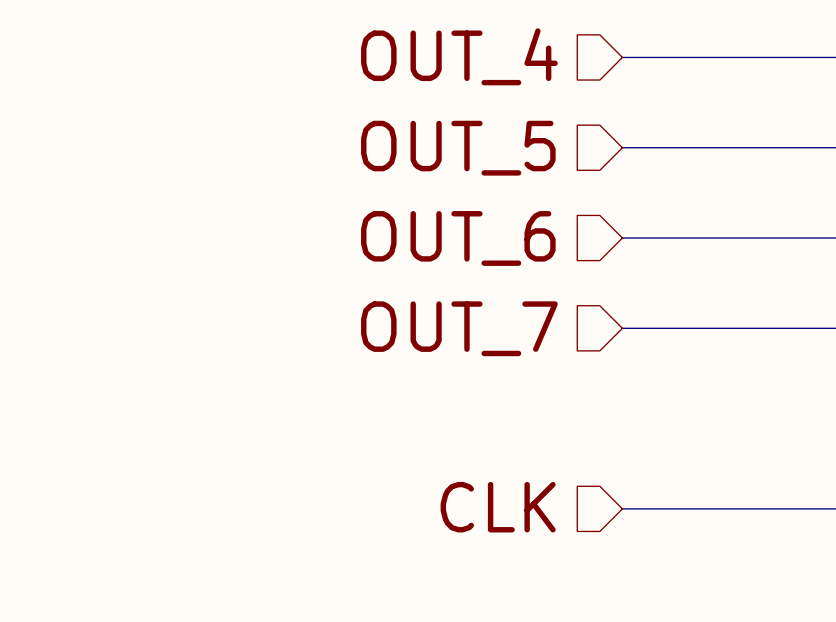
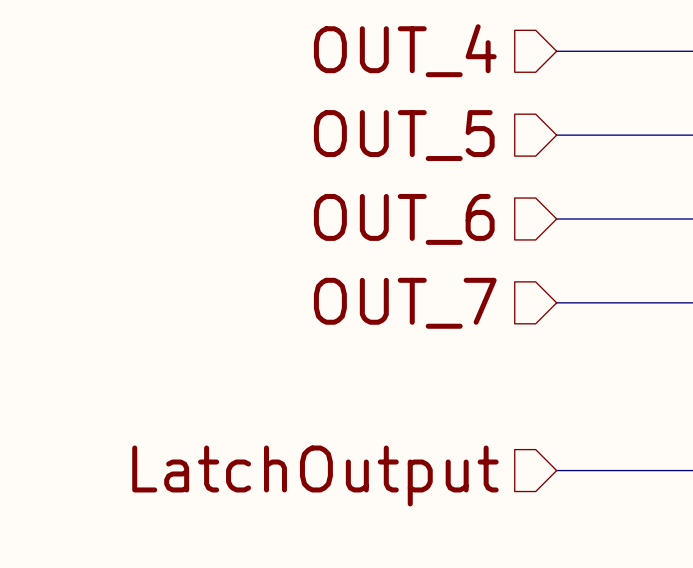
hierarchical label: CLK (498, 507) -> LatchOutput (315, 475)

